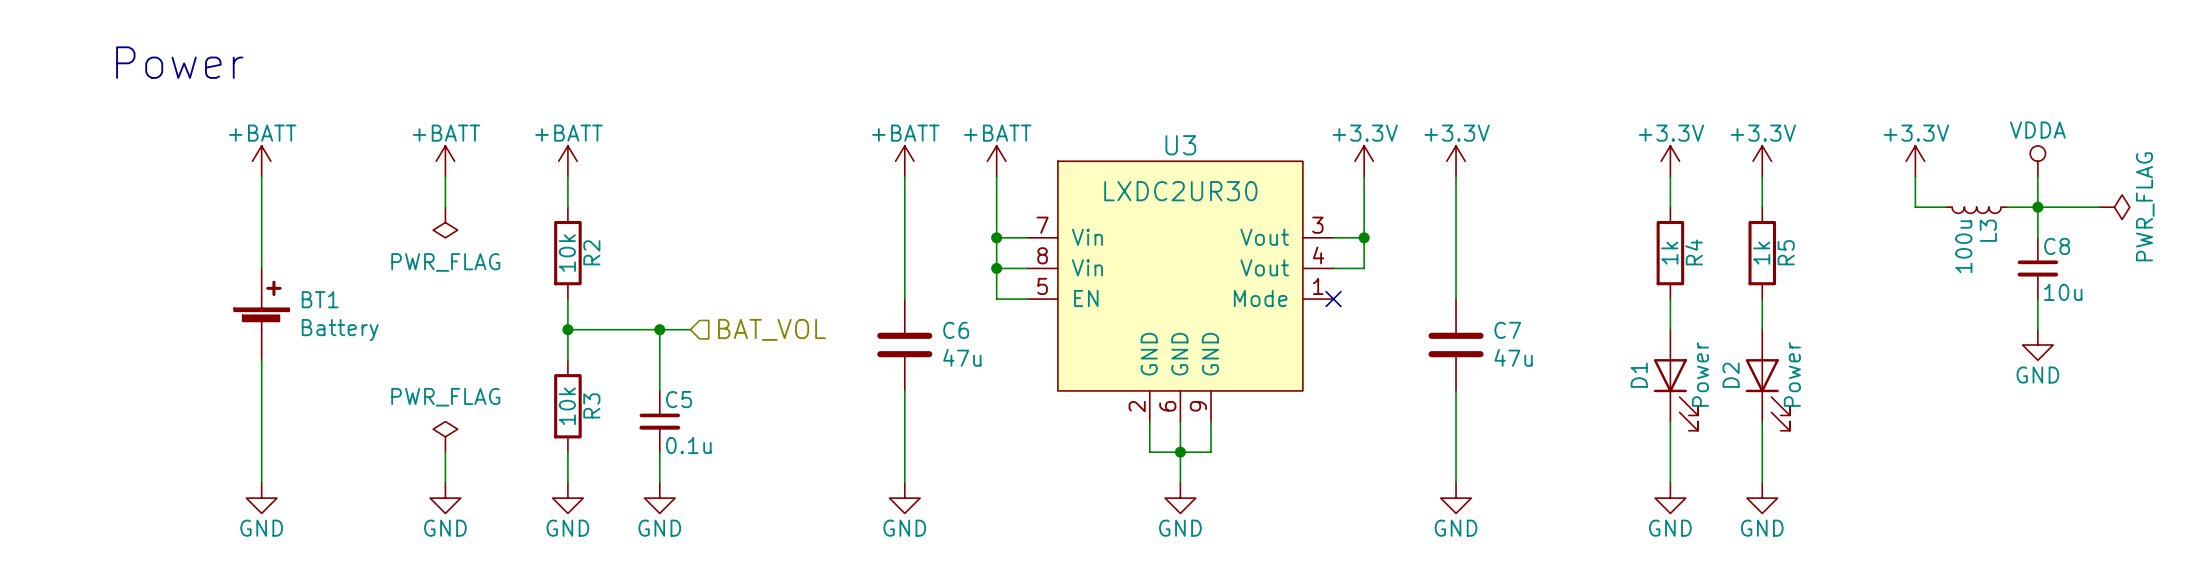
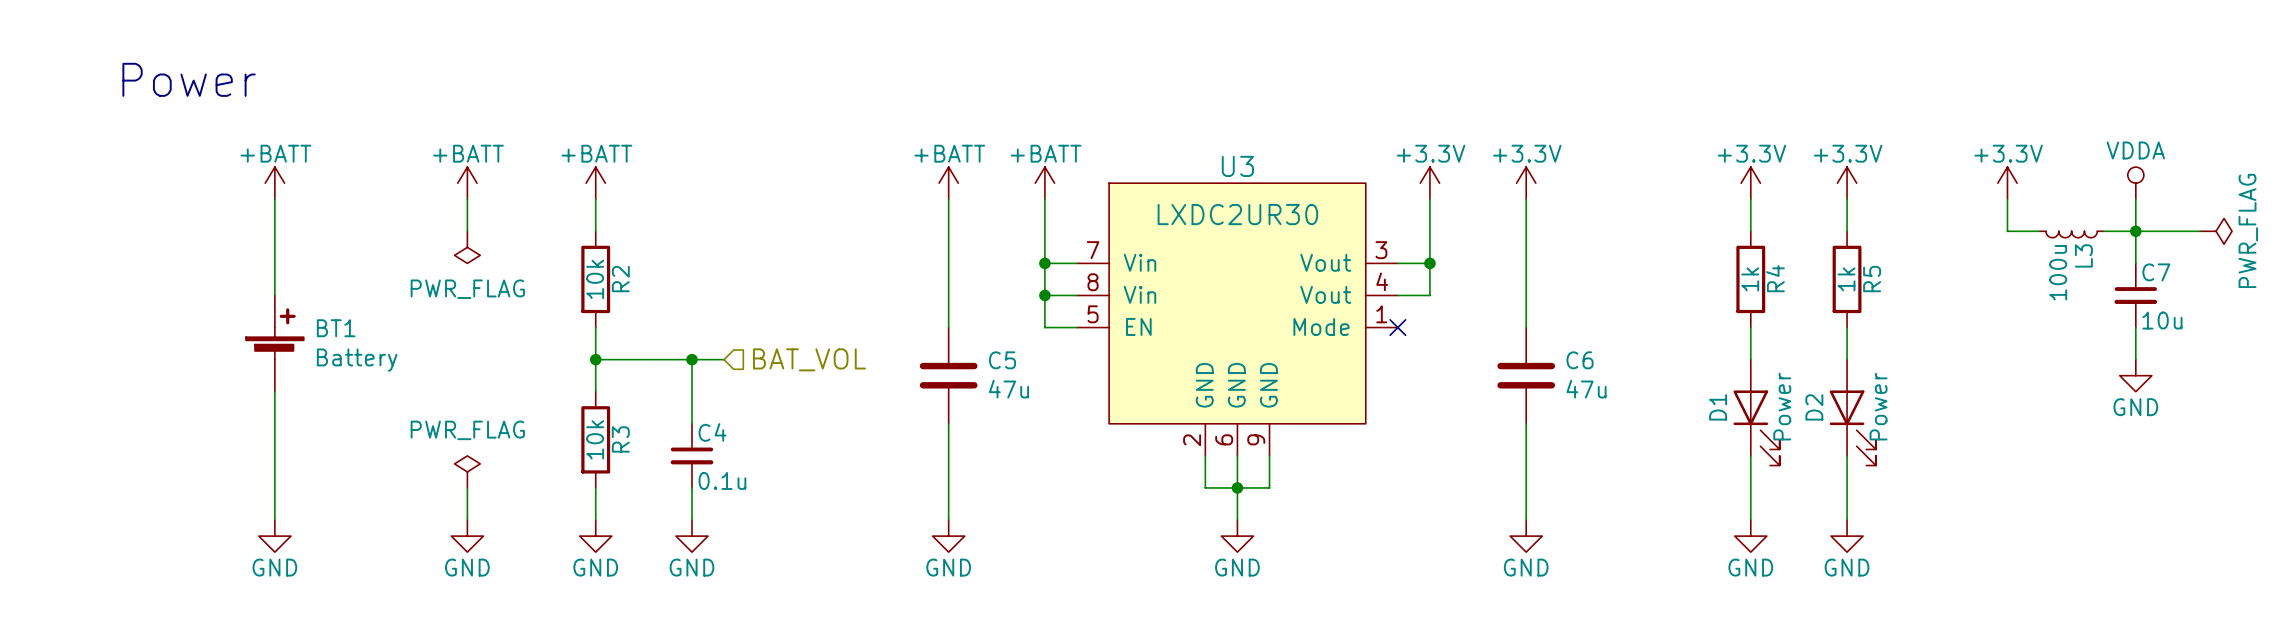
C8 name: C8 (2057, 246) -> C7 (2156, 272)
C6 name: C6 (956, 330) -> C5 (1002, 360)
C7 name: C7 (1507, 330) -> C6 (1580, 360)
C5 name: C5 (679, 399) -> C4 (712, 432)

